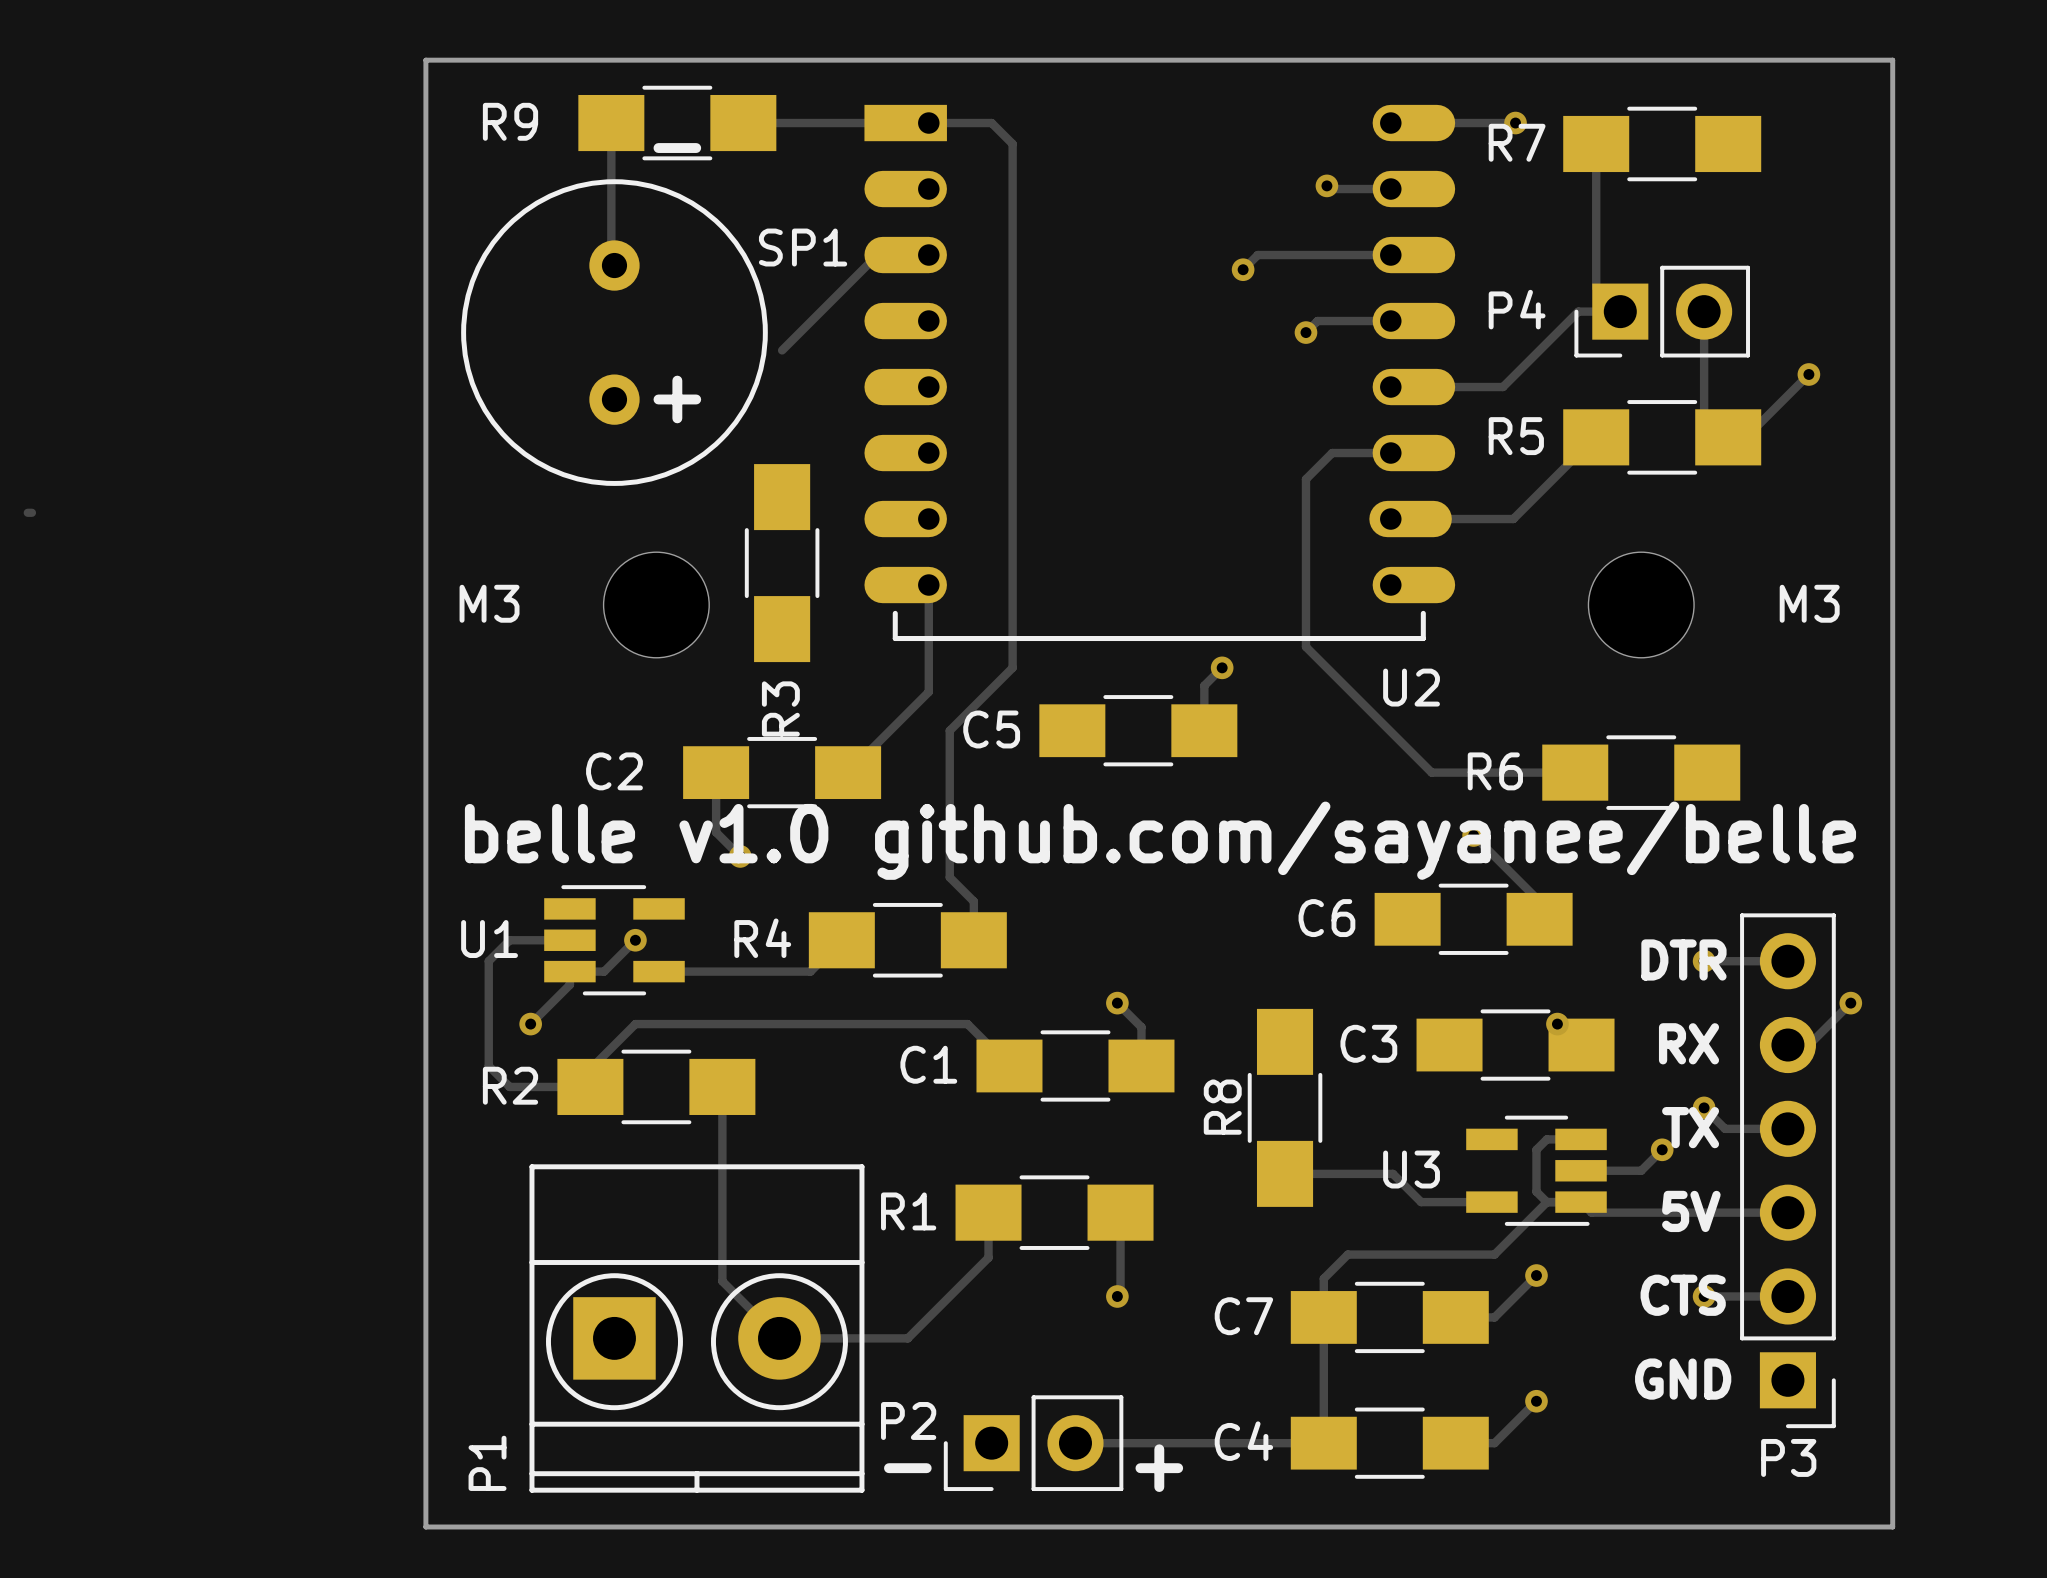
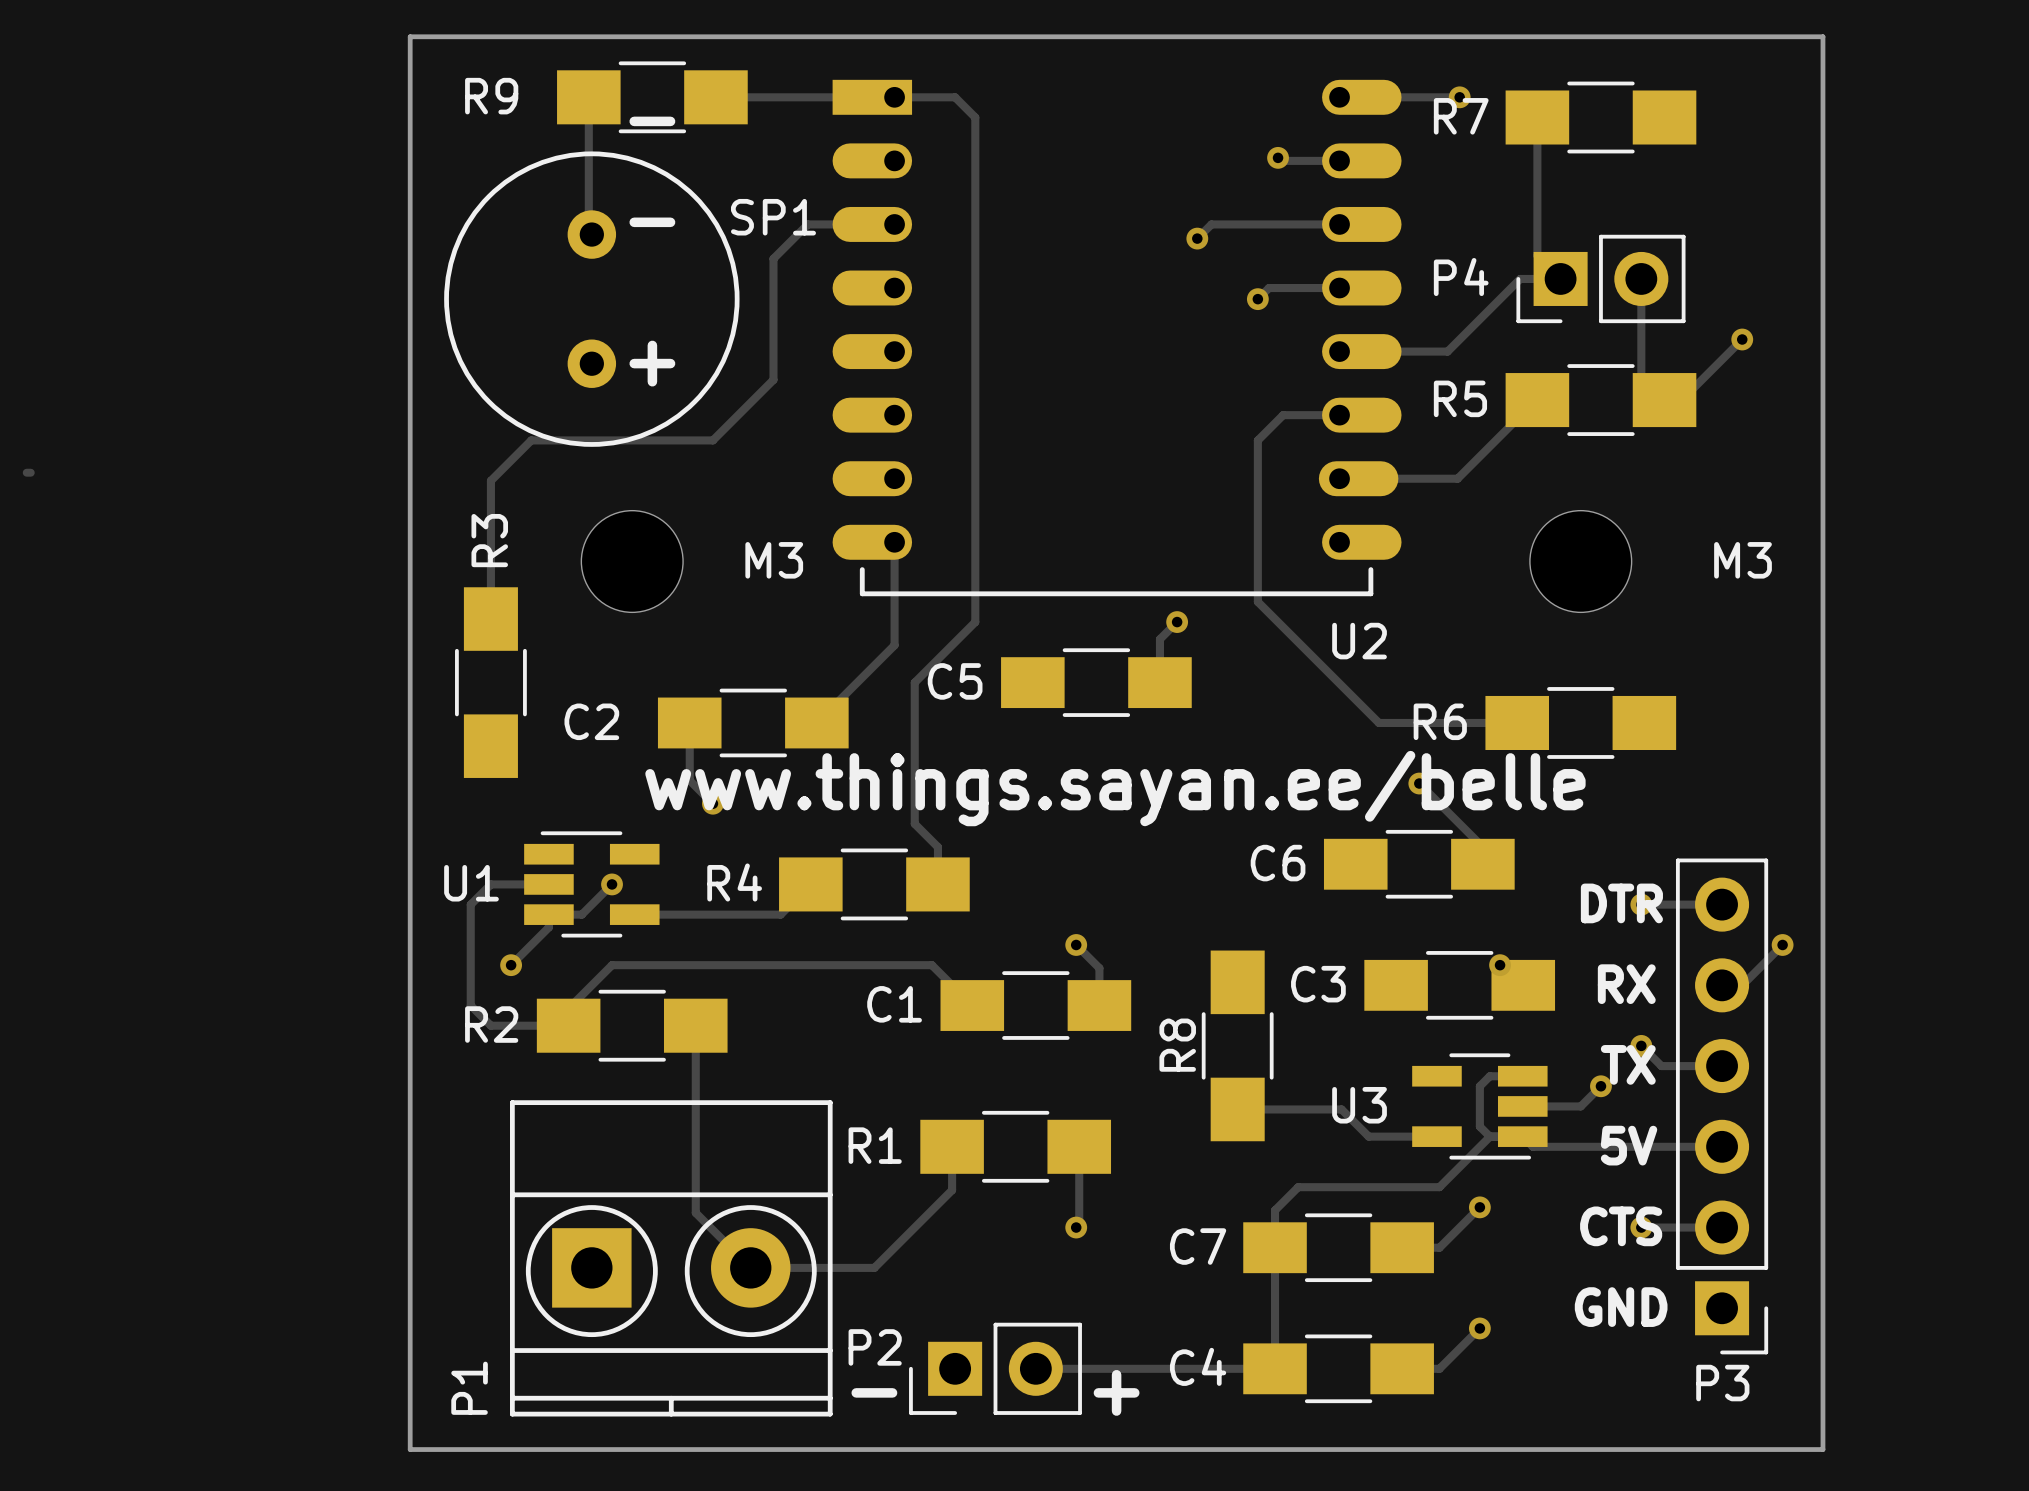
text: none -> - (652, 222)
track: (877, 255) (782, 350) -> (845, 224) (807, 224) (773, 258) (773, 379) (712, 440) (531, 440) (490, 480) (490, 619)
R3 position: (782, 563) -> (490, 682)
M3 name position: M3 (489, 603) -> M3 (774, 560)
R3 name position: R3 (780, 708) -> R3 (489, 540)
text: belle v1.0 github.com/sayanee/belle (1160, 840) -> www.things.sayan.ee/belle (1115, 788)

